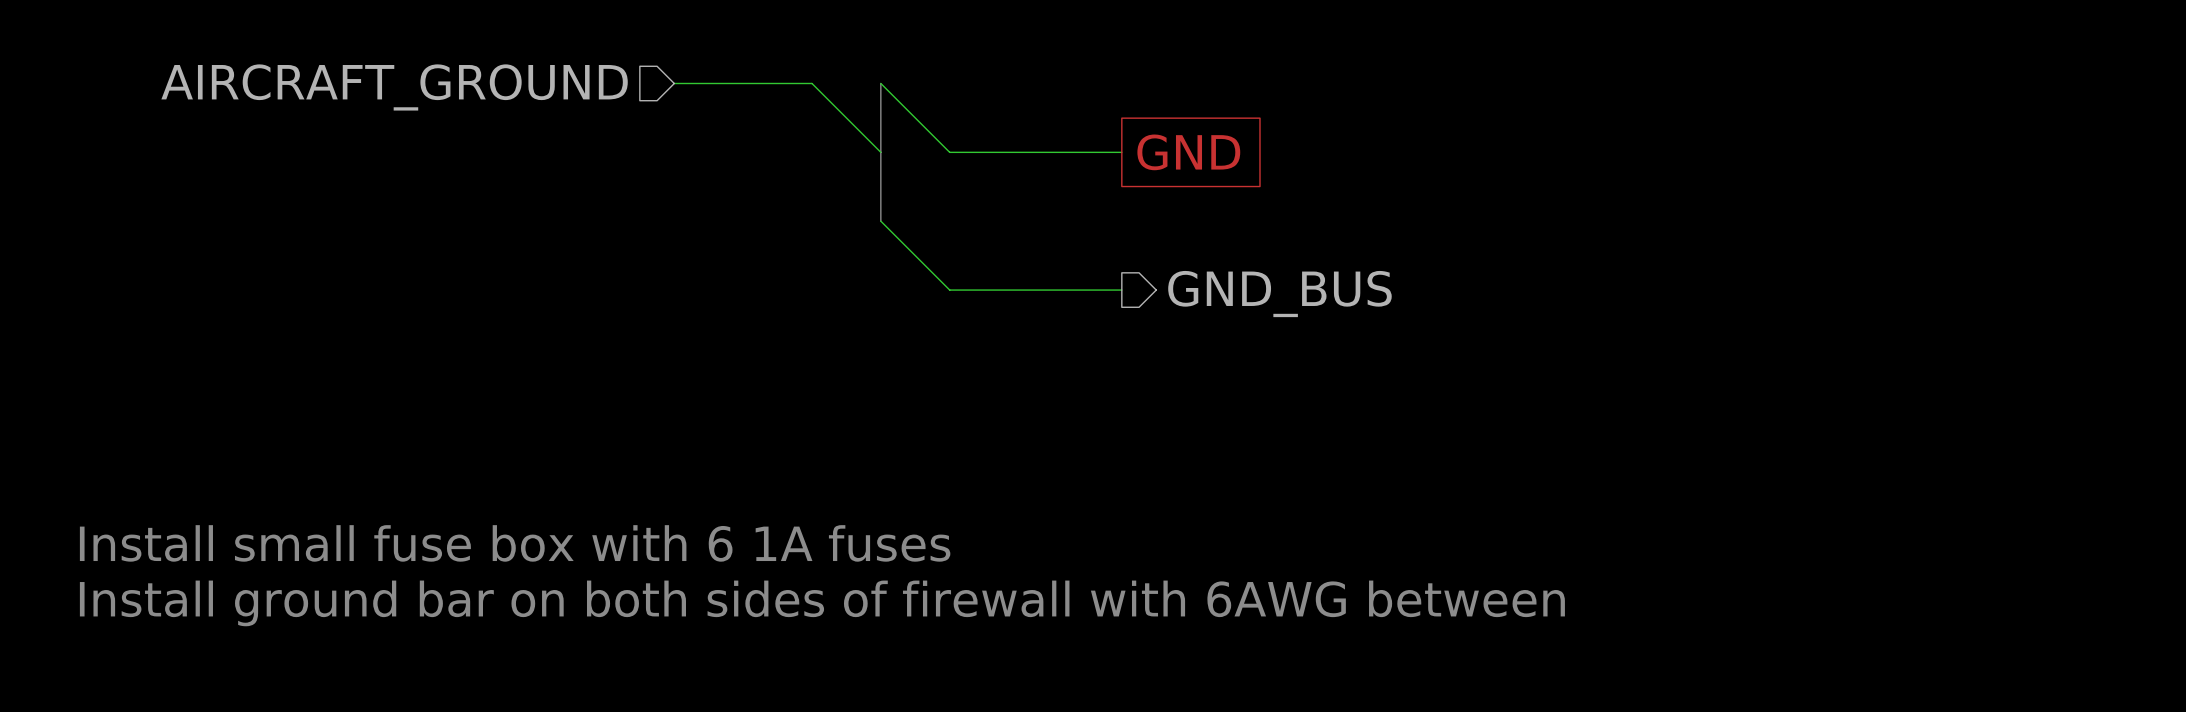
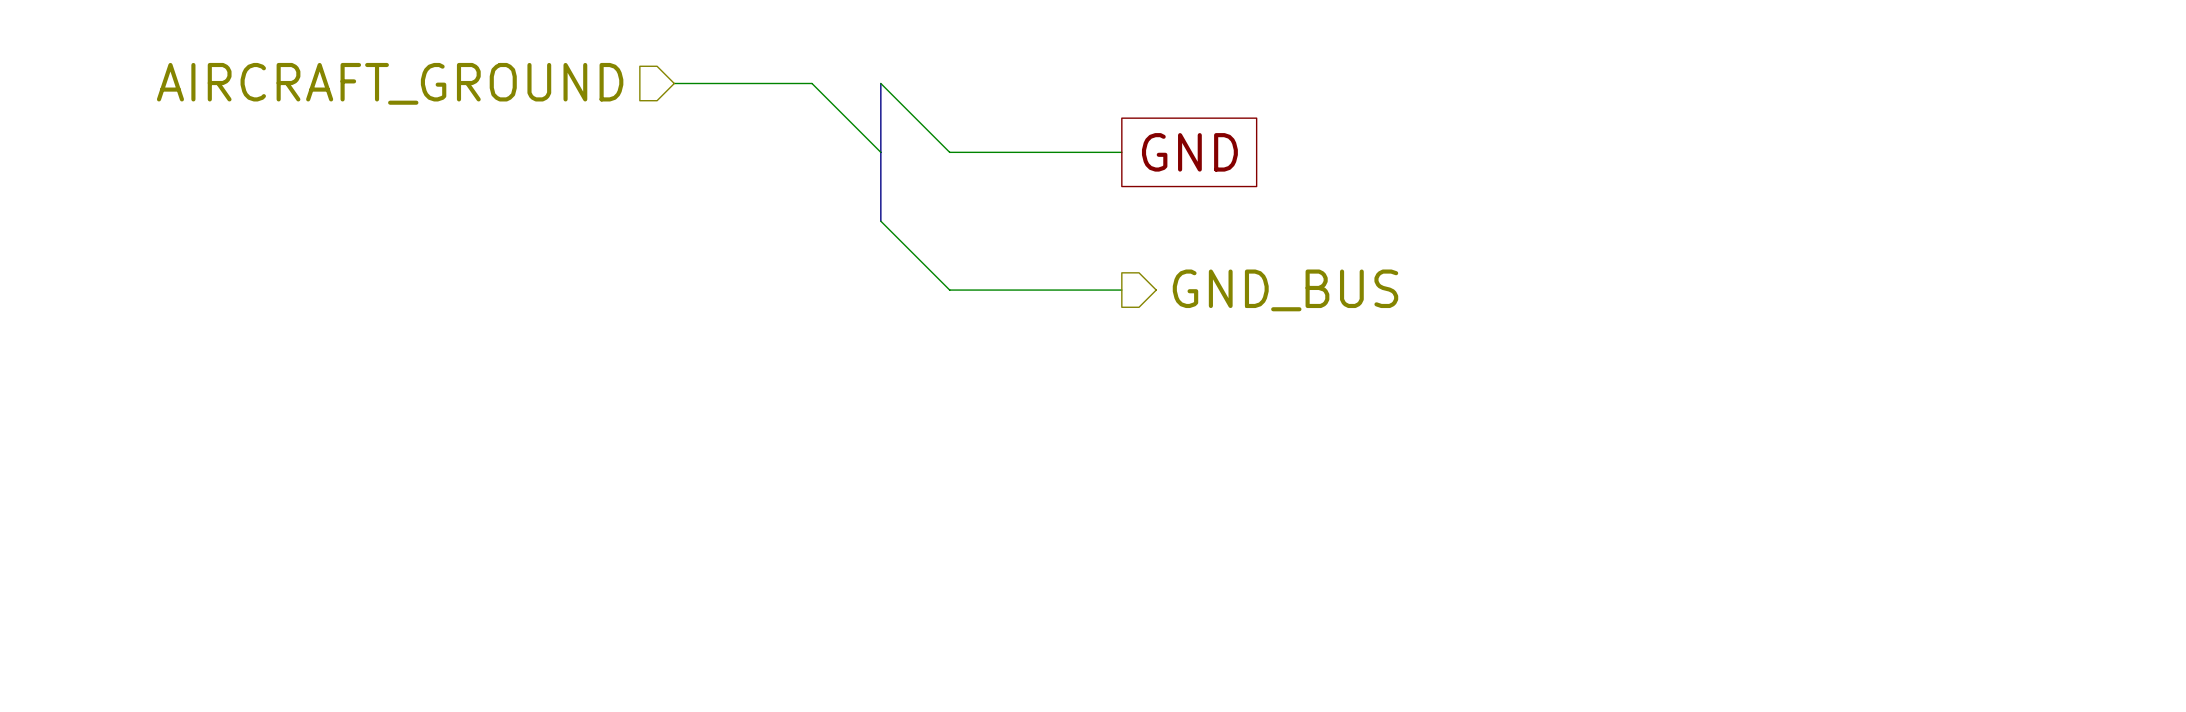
text: Install small fuse box with 6 1A fuses (515, 543) -> none
text: Install ground bar on both sides of firewall with 6AWG between (822, 603) -> none

